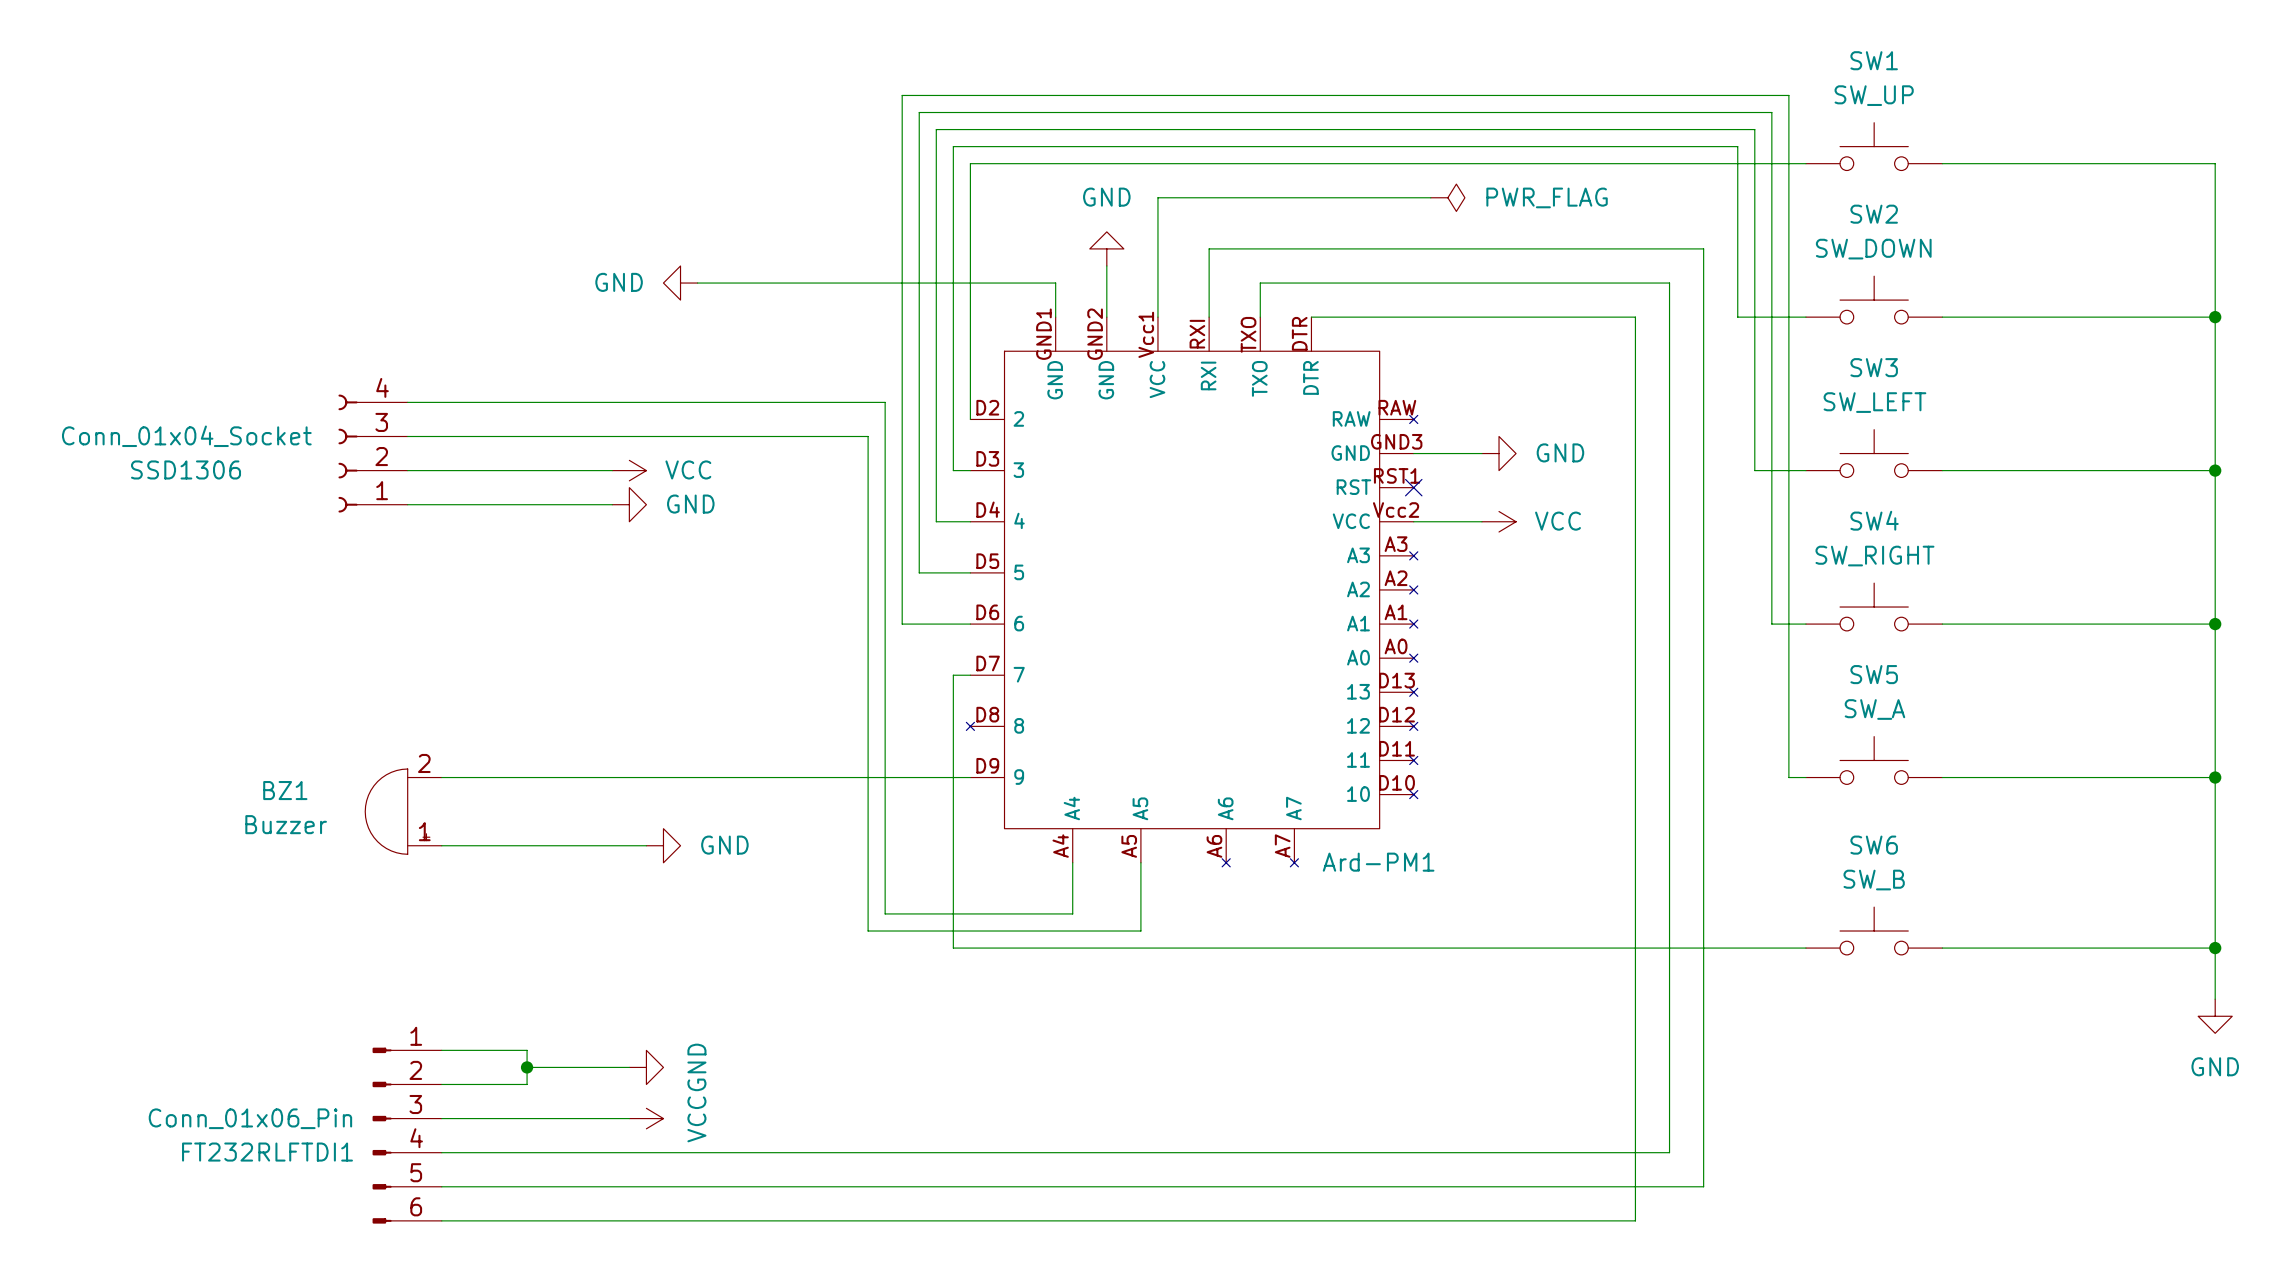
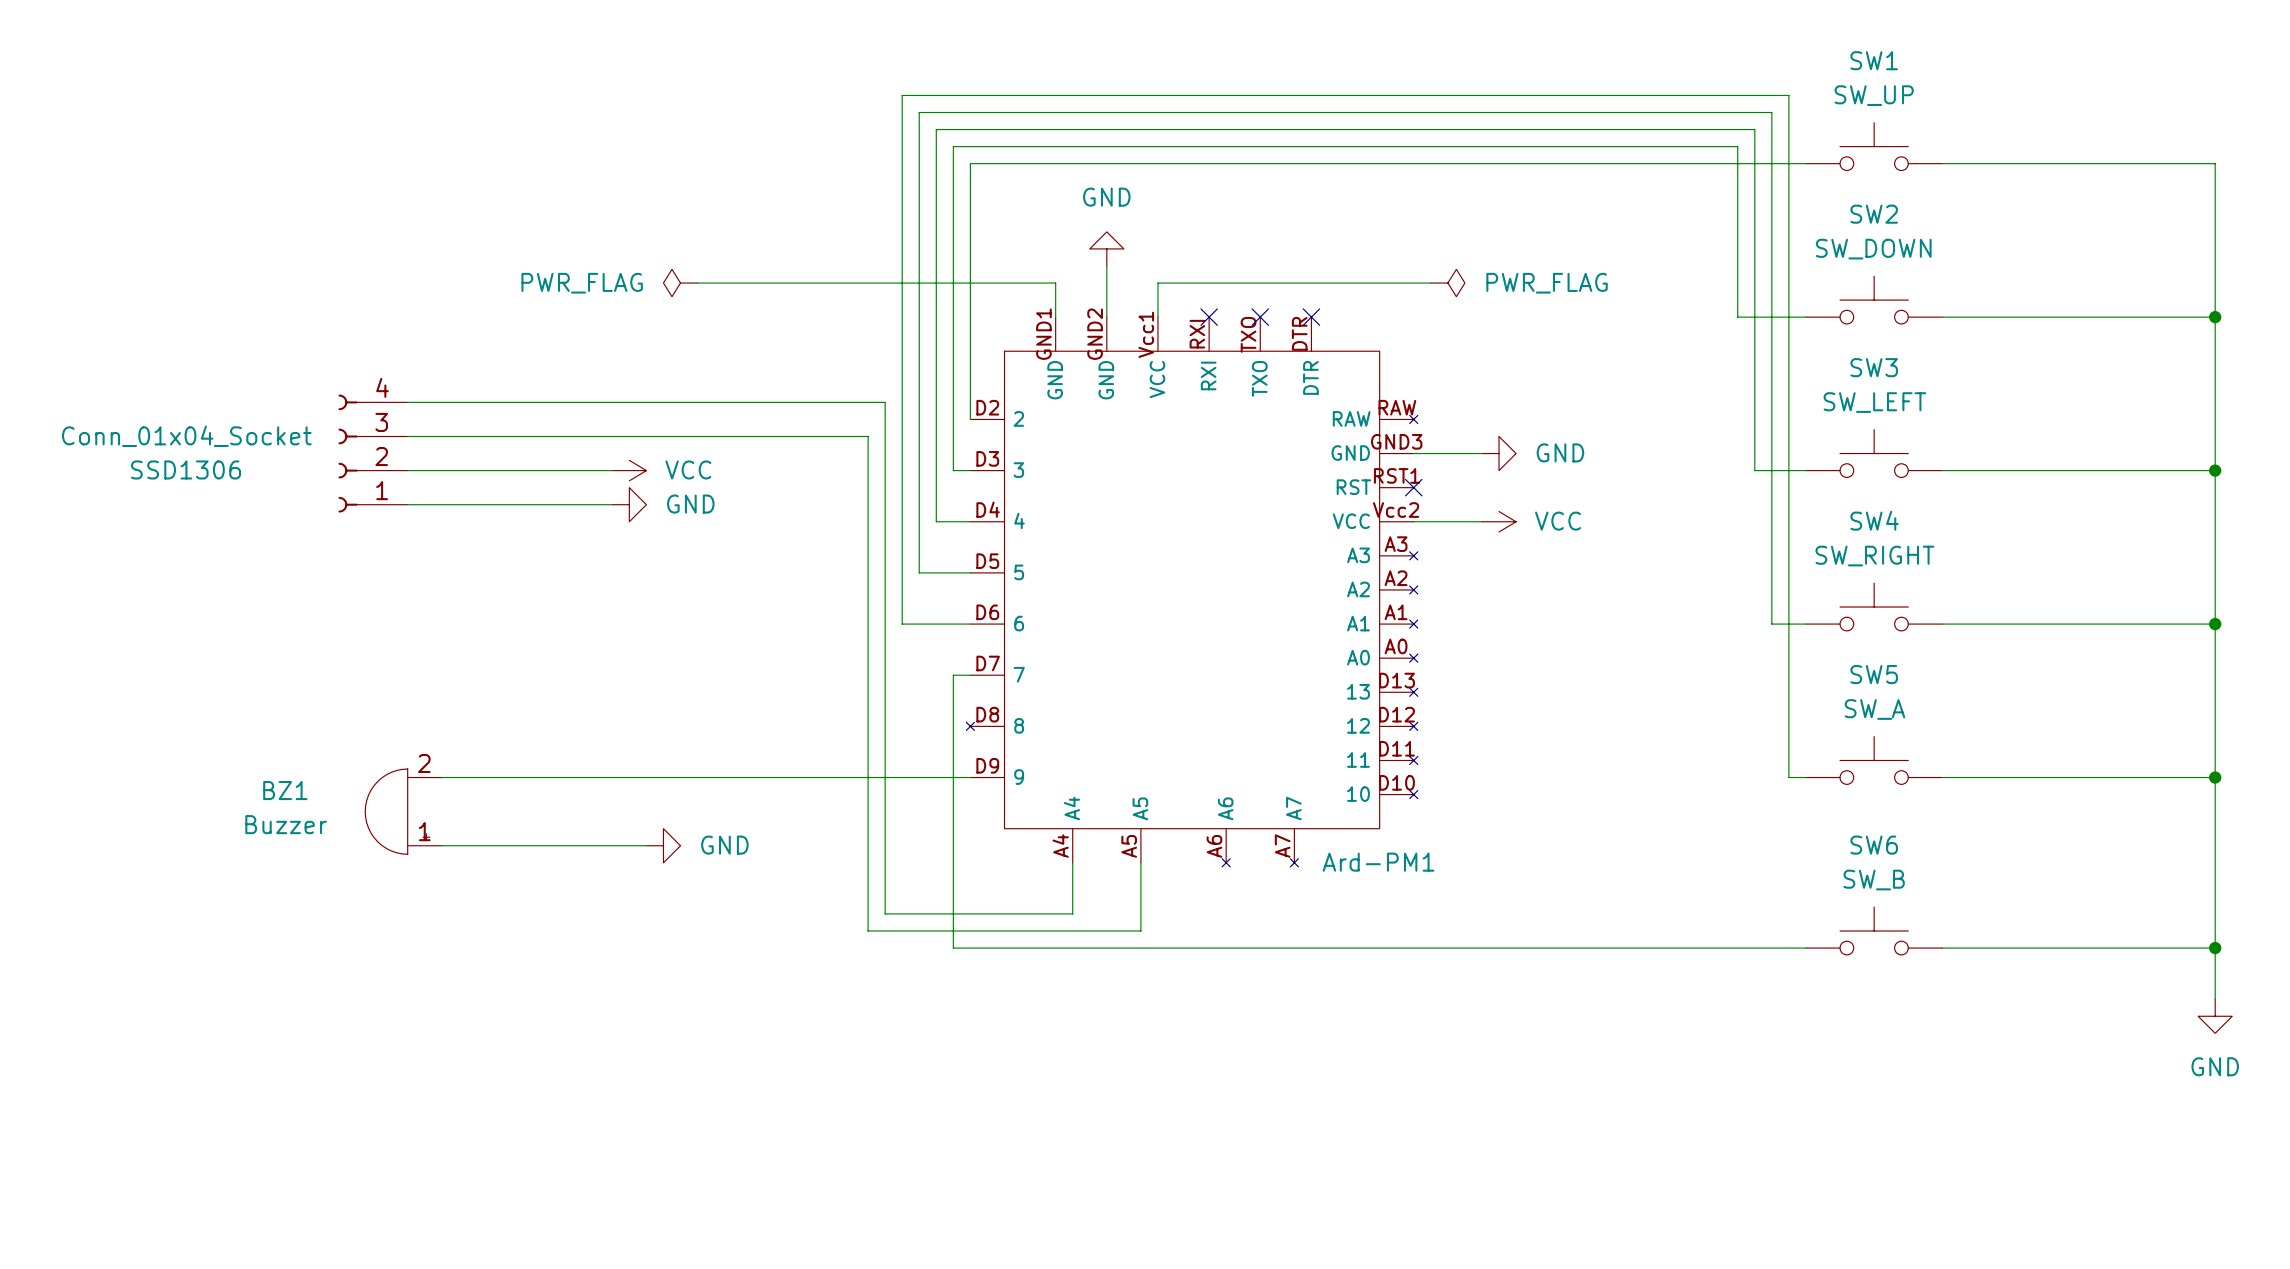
wire: (1430, 197) (1157, 197) (1157, 283) -> none
power symbol position: PWR_FLAG (1447, 197) -> PWR_FLAG (1447, 283)
power symbol: GND (680, 283) -> PWR_FLAG (680, 283)
wire: (1260, 283) (1260, 317) -> (1260, 283) (1157, 283)
wire: (1430, 283) (1669, 283) (1669, 1152) (441, 1152) -> none
wire: (1209, 317) (1209, 248) (1703, 248) (1703, 1186) (441, 1186) -> none
no-connect mark: none -> (1209, 317)
no-connect mark: none -> (1260, 317)
wire: (1311, 317) (1635, 317) (1635, 1220) (441, 1220) -> none
no-connect mark: none -> (1311, 317)
wire: (441, 1050) (527, 1050) (527, 1084) (441, 1084) -> none
wire: (527, 1067) (629, 1067) -> none
junction: (527, 1067) -> none
power symbol: GND (646, 1067) -> none
wire: (441, 1118) (629, 1118) -> none
power symbol: VCC (646, 1118) -> none
FT232RLFTDI1: Conn_01x06_Pin (407, 1135) -> none

